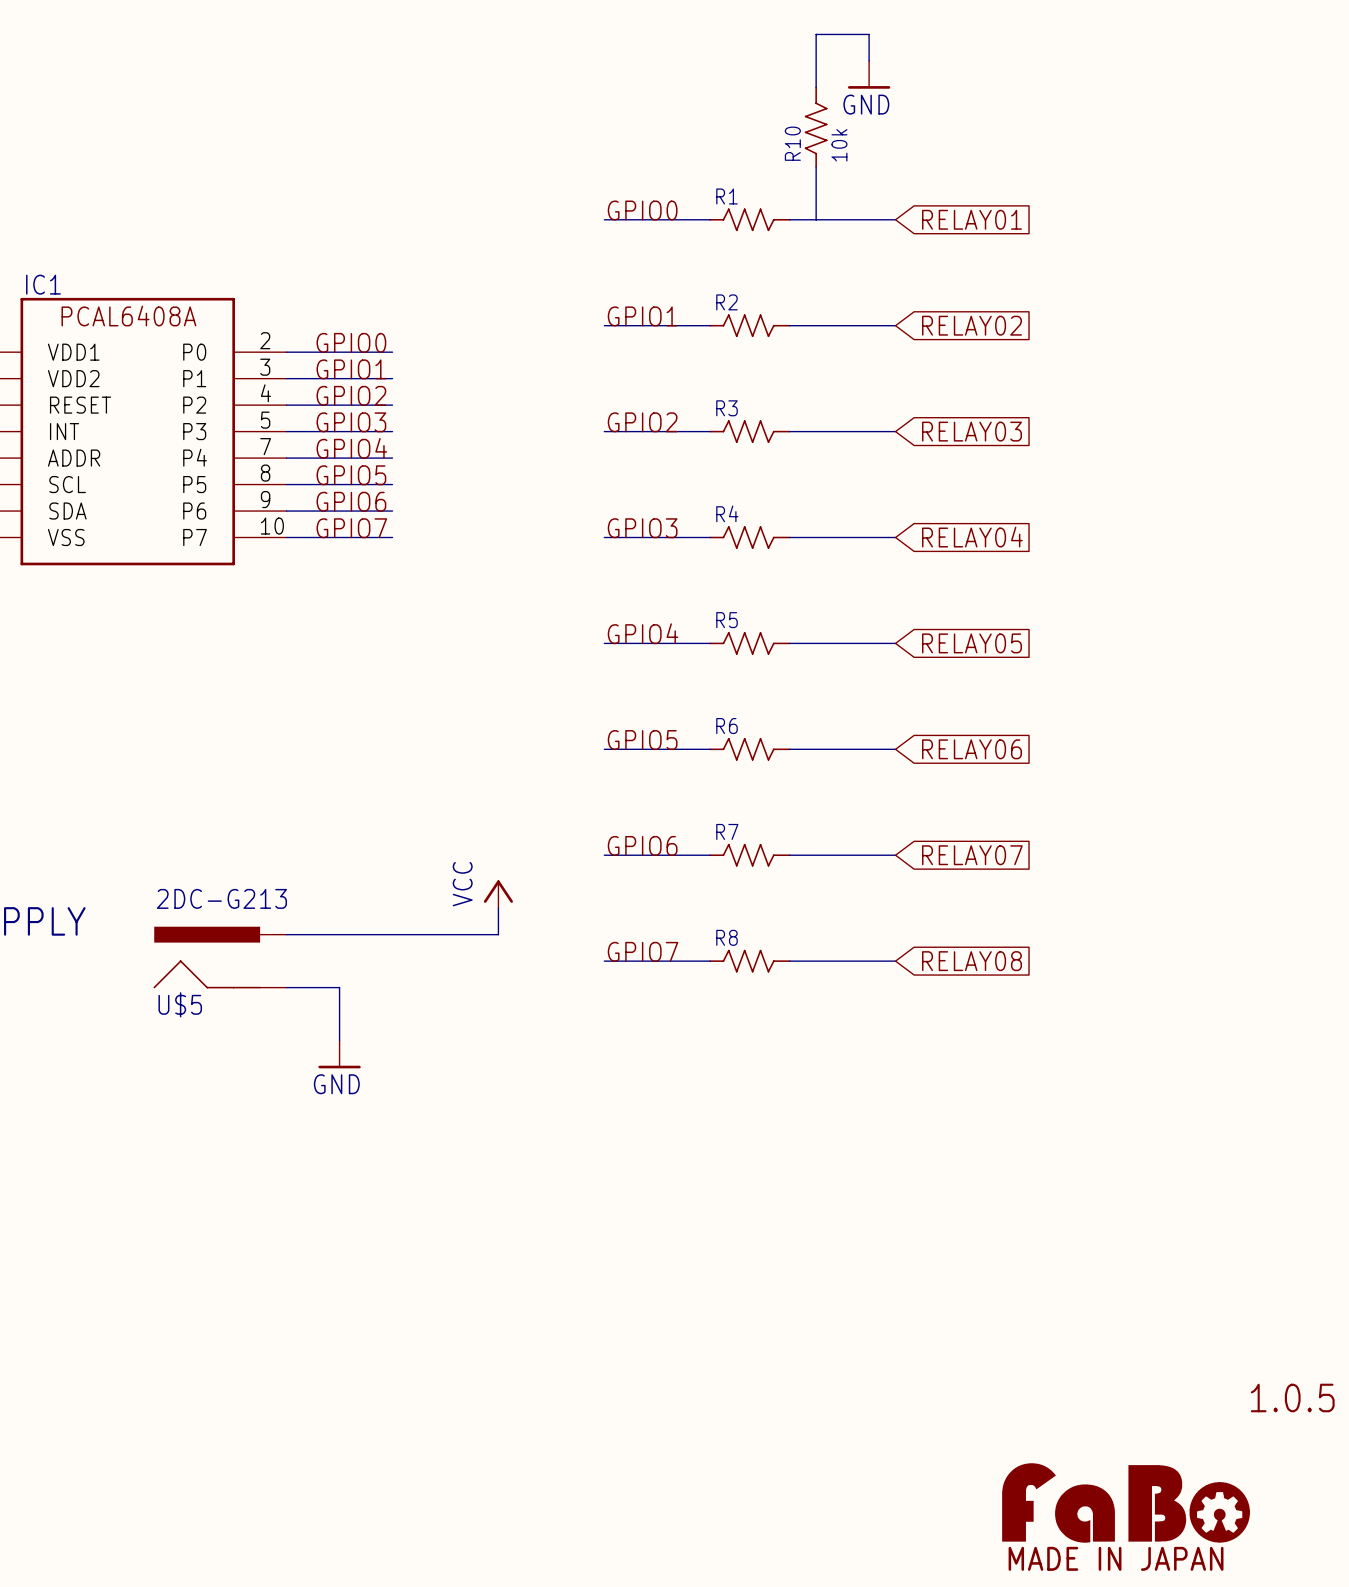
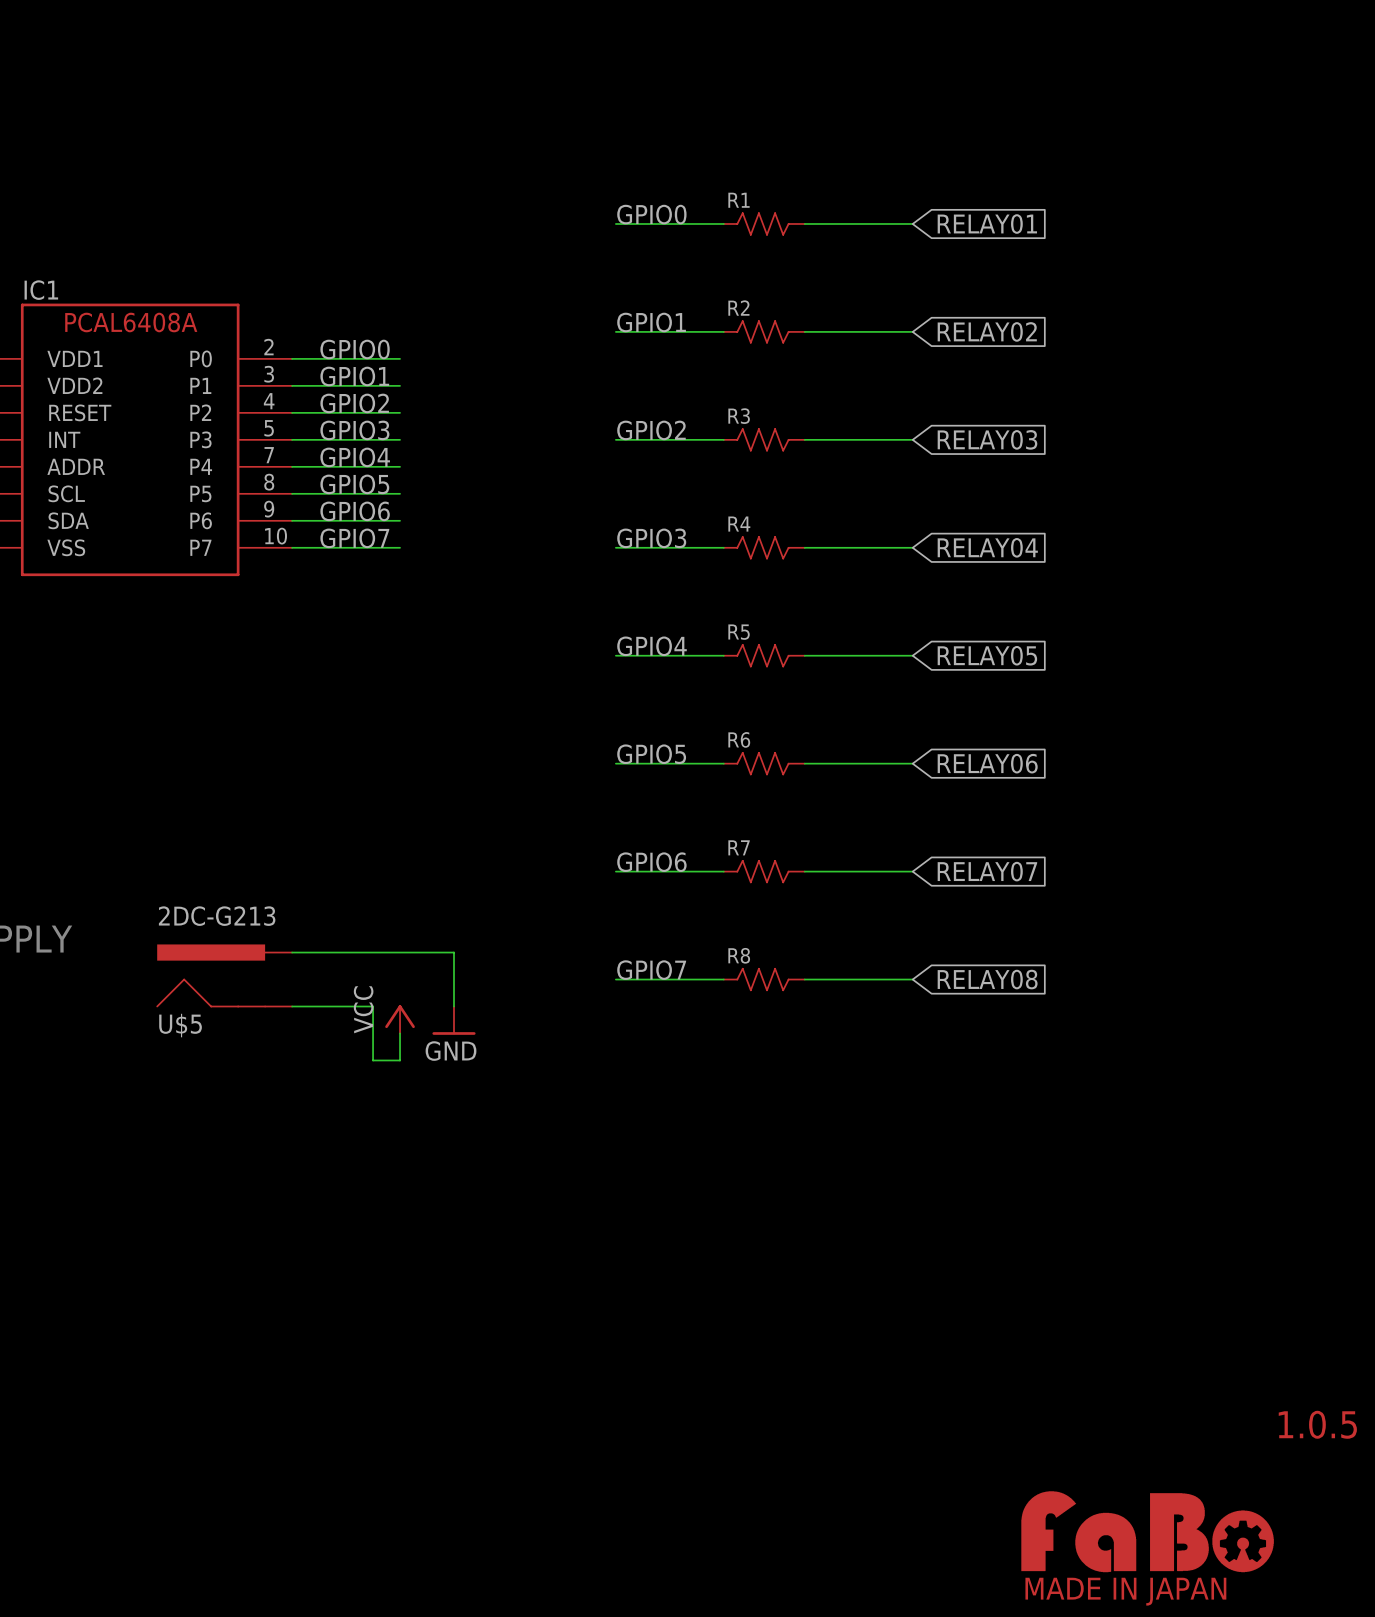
wire: (869, 60) (869, 34) (816, 34) (816, 87) -> none
power symbol: GND (869, 74) -> none
R10: 10k (816, 127) -> none
wire: (816, 166) (816, 219) -> none
power symbol position: VCC (498, 894) -> VCC (400, 1019)
wire: (498, 908) (498, 934) (445, 934) -> (453, 1006) (453, 952)
wire: (339, 987) (339, 1040) -> (346, 1006) (373, 1006) (373, 1060) (400, 1060) (400, 1033)
power symbol position: GND (339, 1054) -> GND (453, 1020)

